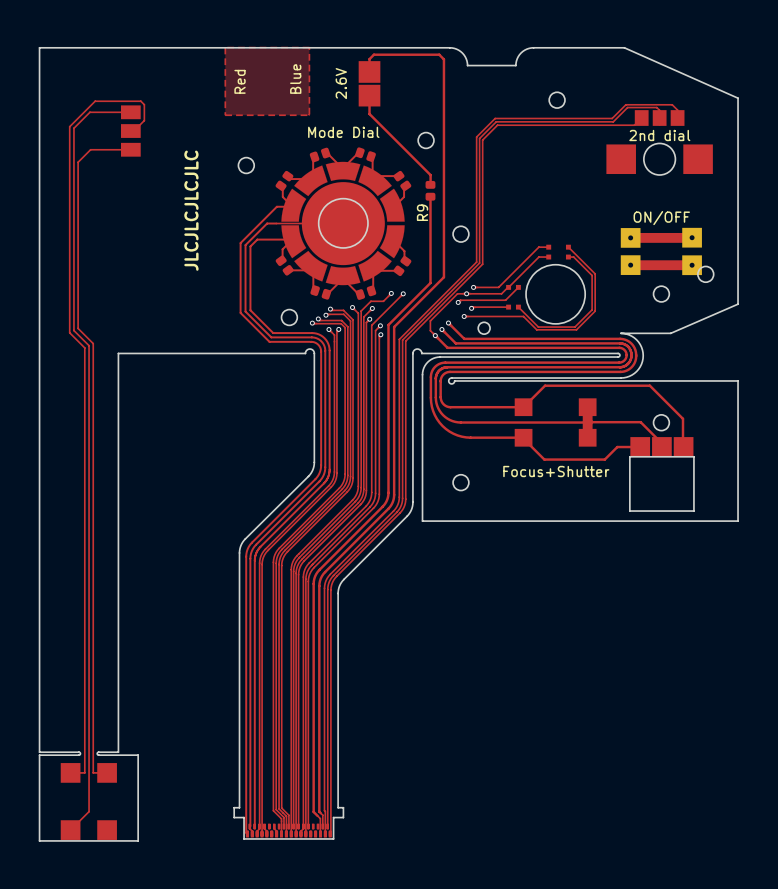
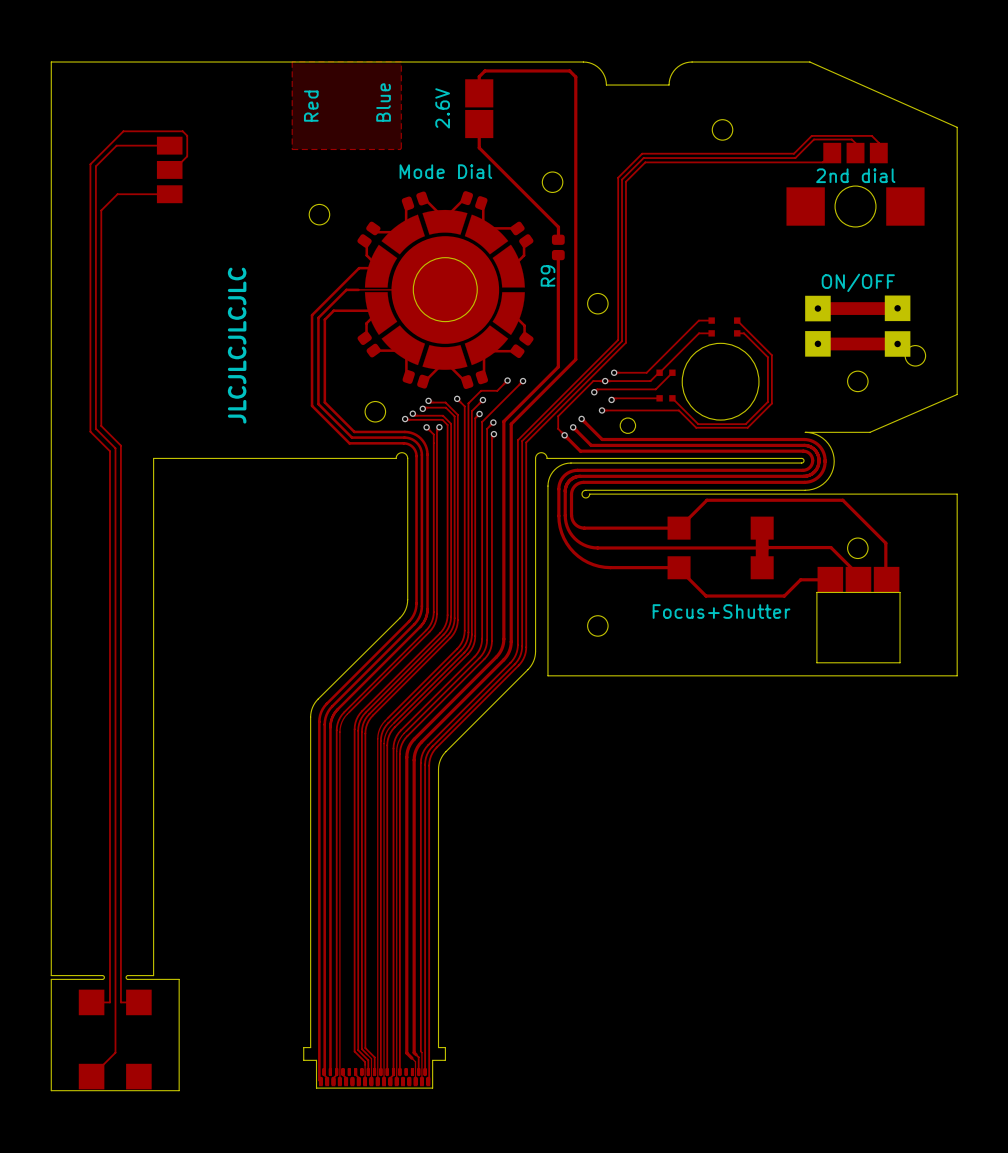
text position: JLCJLCJLCJLC (191, 210) -> JLCJLCJLCJLC (237, 345)

